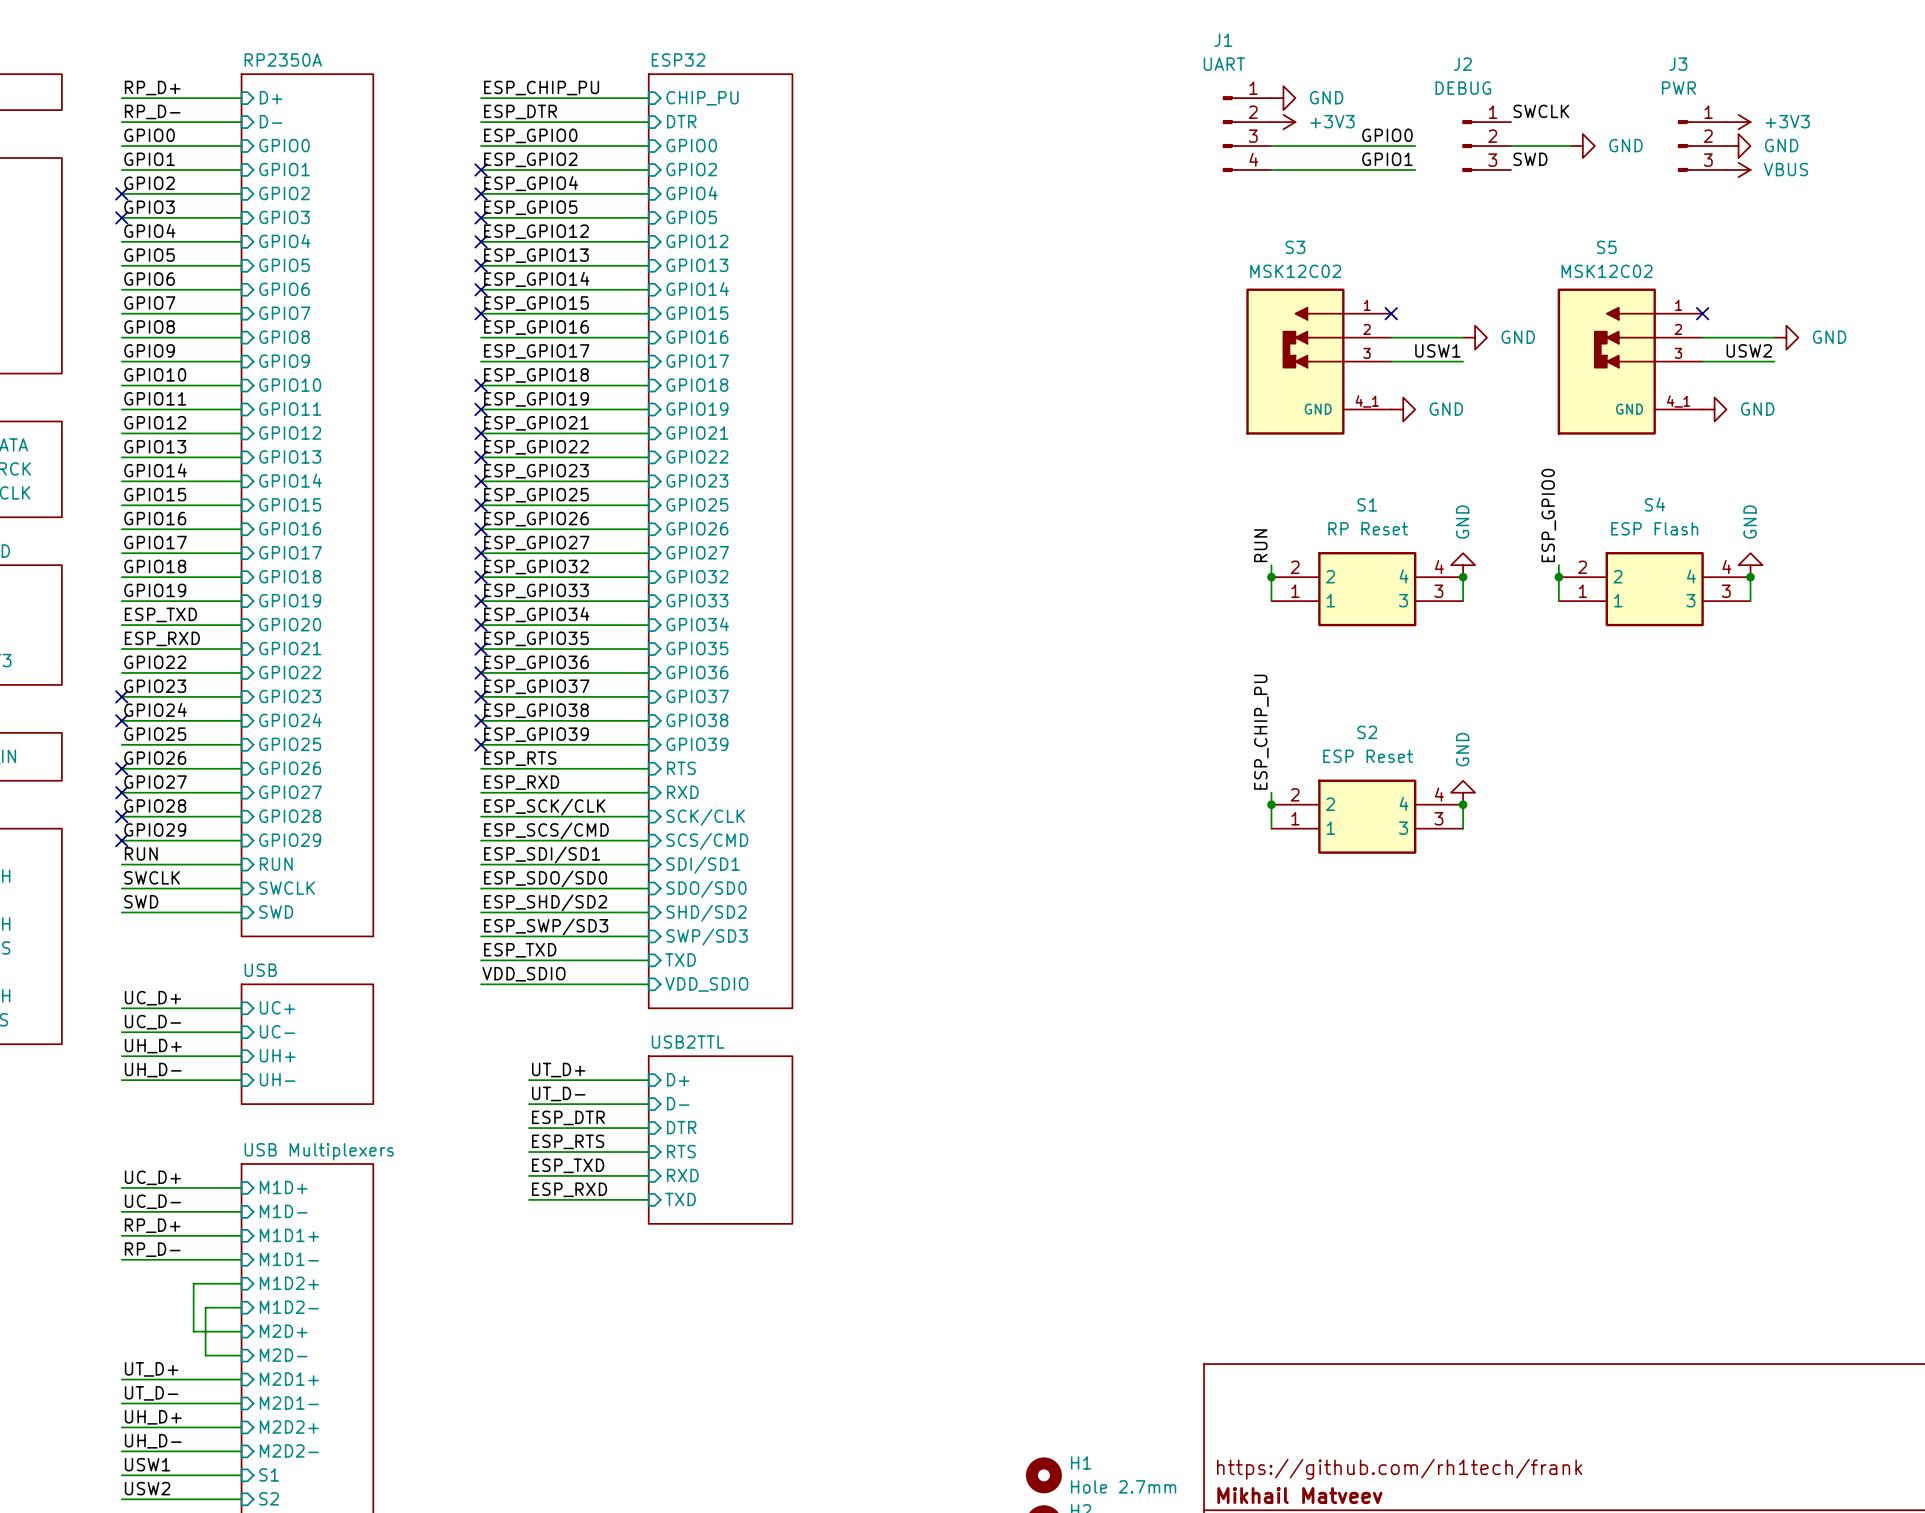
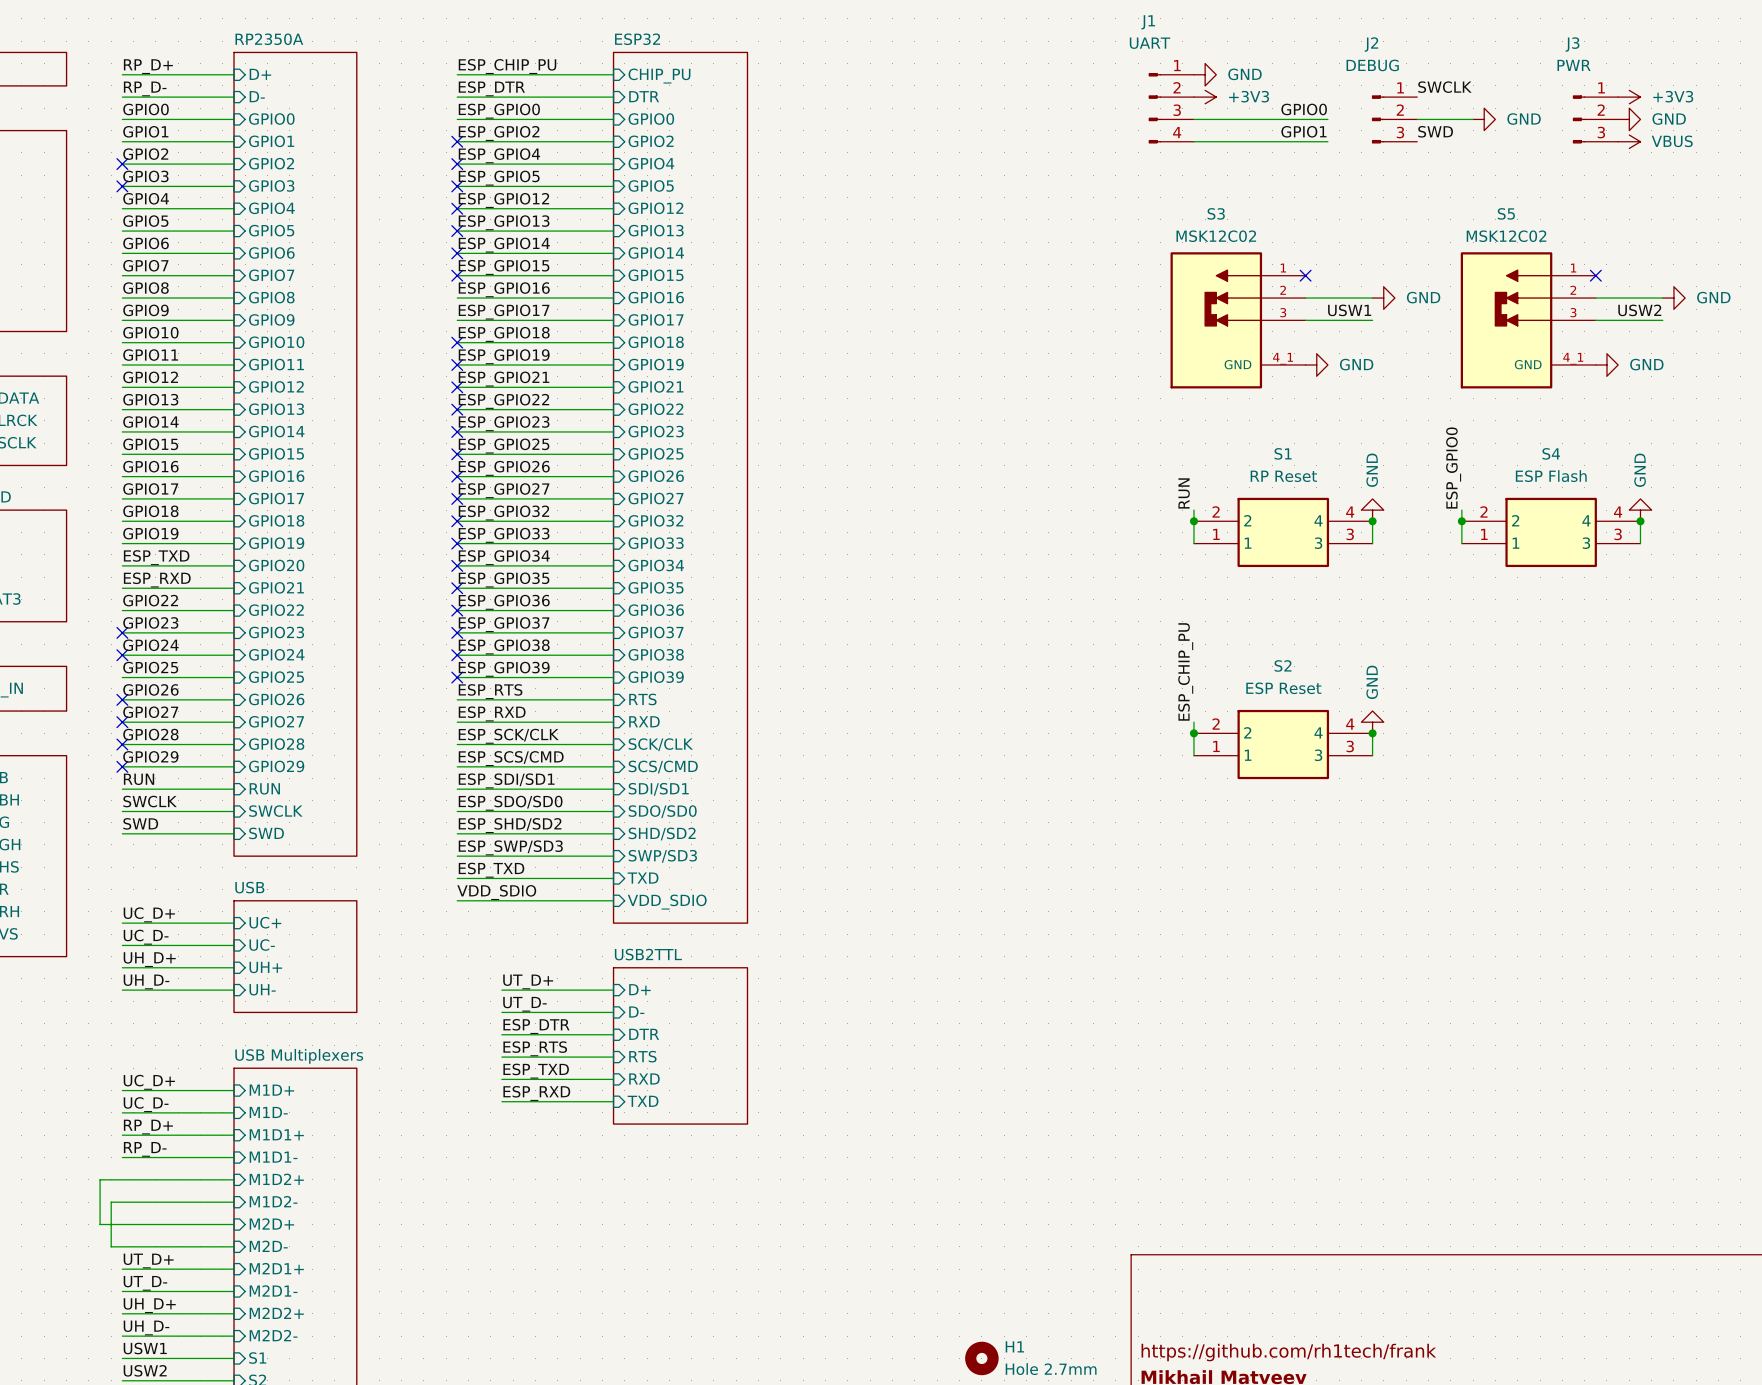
wire: (193, 1283) (193, 1331) -> (189, 1179) (100, 1179) (100, 1224) (189, 1224)
wire: (205, 1307) (205, 1355) -> (200, 1202) (111, 1202) (111, 1246) (200, 1246)

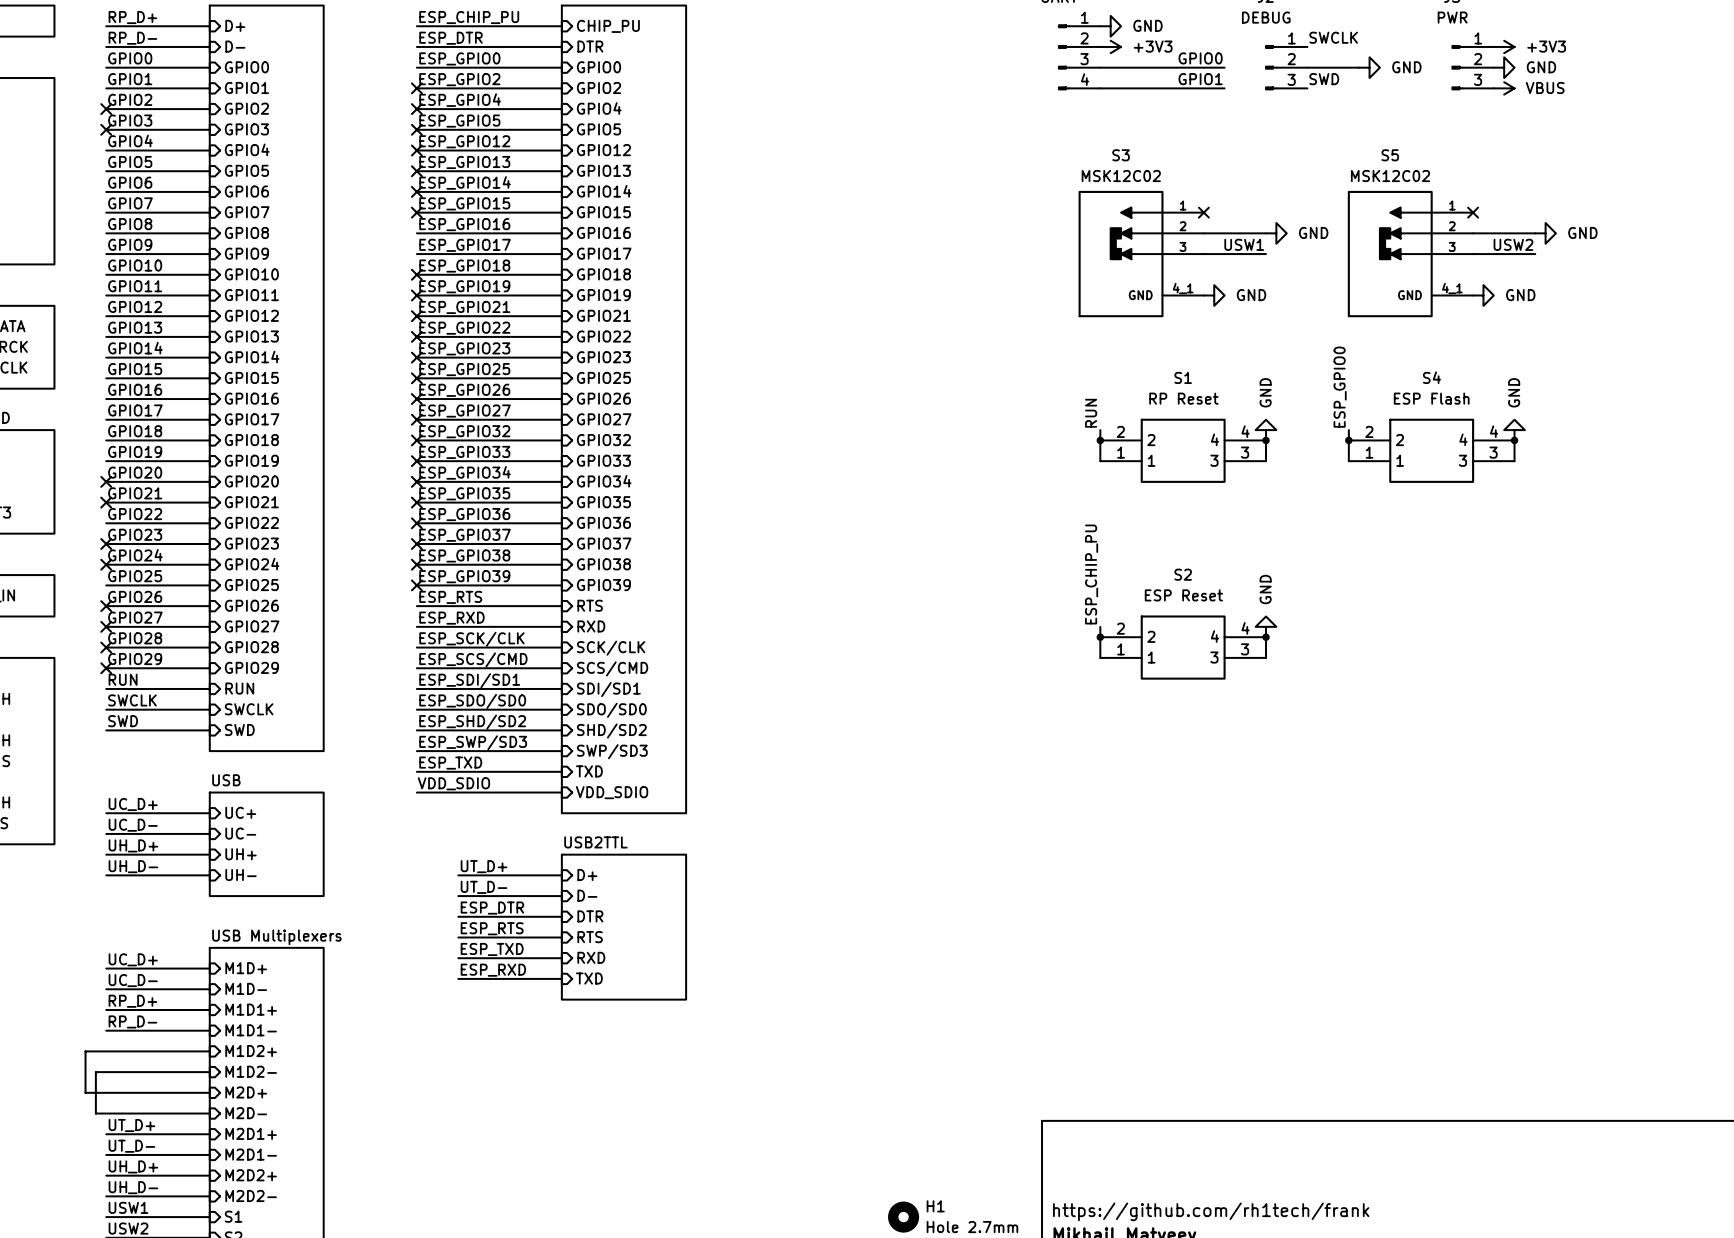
label: ESP_TXD (156, 557) -> GPIO20 (135, 472)
no-connect mark: none -> (106, 481)
label: ESP_RXD (157, 579) -> GPIO21 (135, 493)
no-connect mark: none -> (106, 502)

